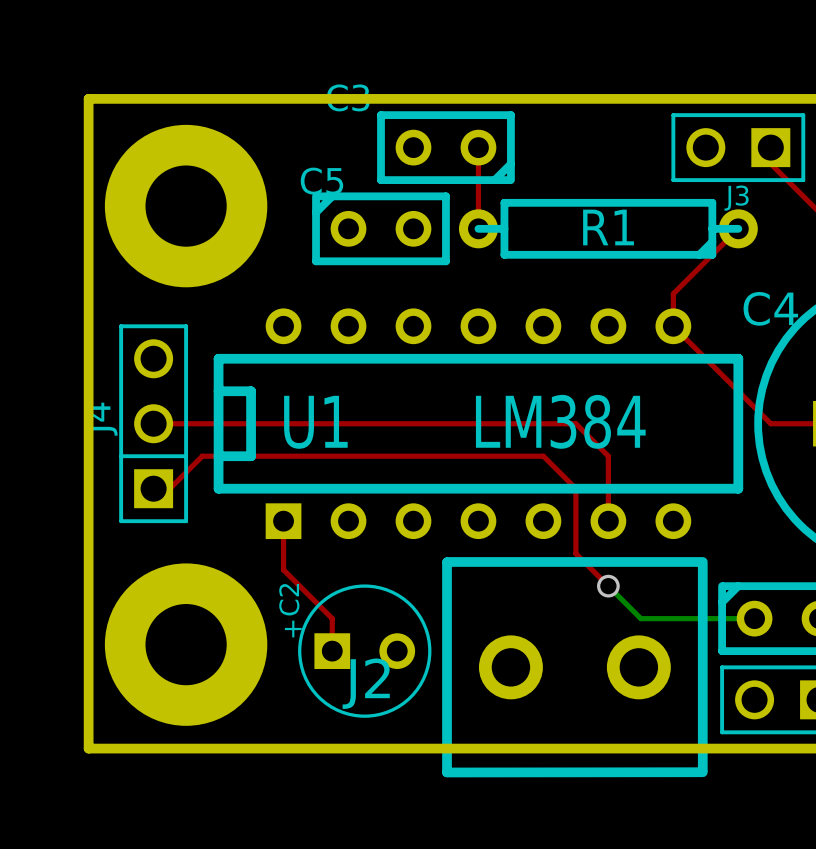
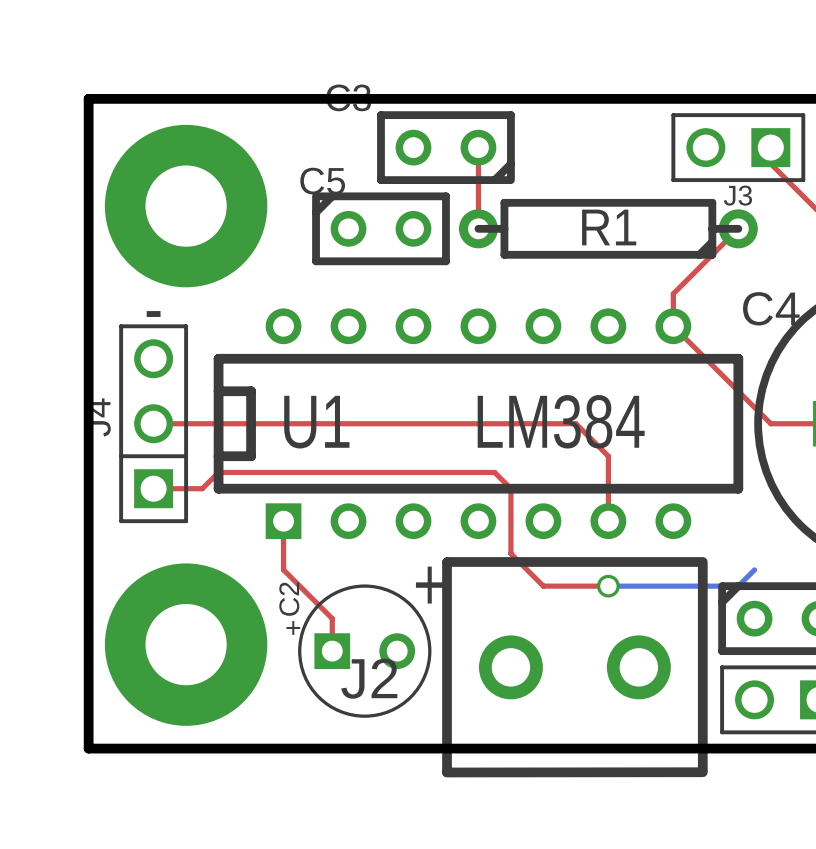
text: none -> - (153, 314)
top track: (169, 488) (202, 456) (543, 456) (575, 488) (575, 553) (608, 586) -> (169, 488) (202, 488) (218, 472) (494, 472) (510, 488) (510, 553) (543, 586) (608, 586)
bottom track: (608, 586) (640, 618) (754, 618) -> (608, 586) (738, 586) (754, 569)
text: none -> + (429, 585)

